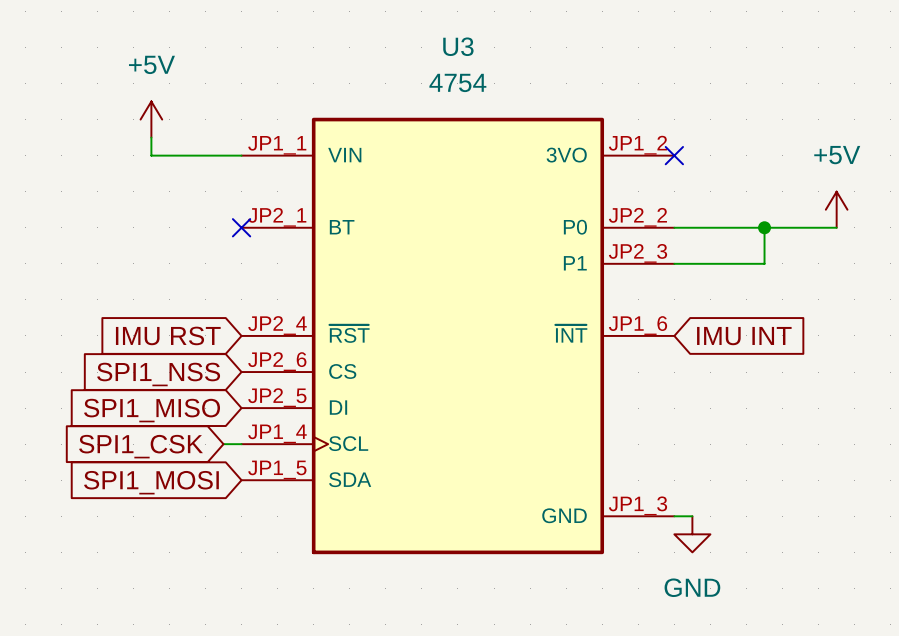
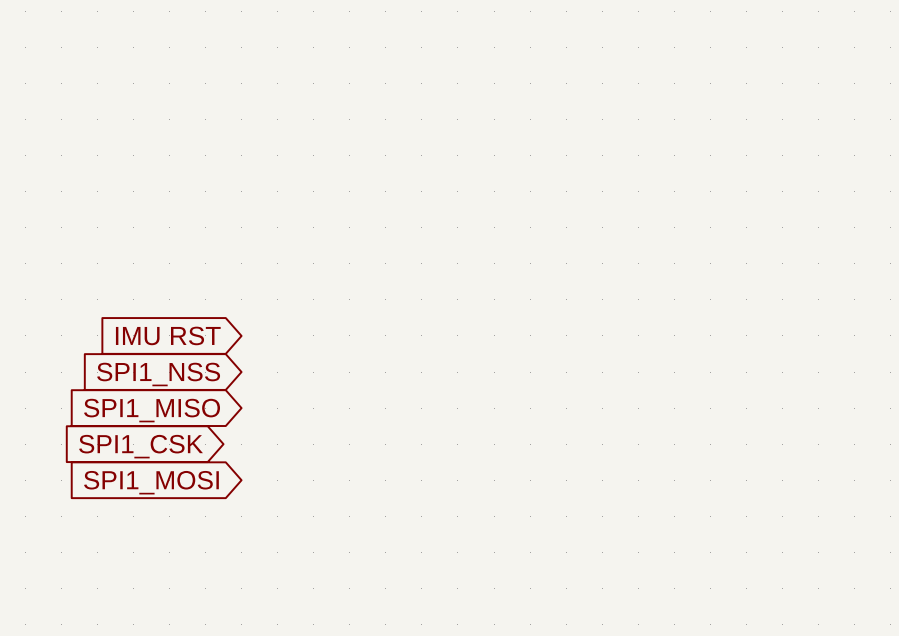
power symbol: +5V (151, 119) -> none
wire: (151, 137) (151, 155) (241, 155) -> none
no-connect mark: (674, 155) -> none
power symbol: +5V (836, 209) -> none
no-connect mark: (241, 227) -> none
wire: (674, 227) (836, 227) -> none
wire: (764, 227) (764, 263) (674, 263) -> none
junction: (764, 227) -> none
U3: 4754 (457, 335) -> none
global label: IMU INT (744, 336) -> none
wire: (223, 444) (241, 444) -> none
wire: (674, 516) (692, 516) -> none
power symbol: GND (692, 534) -> none

